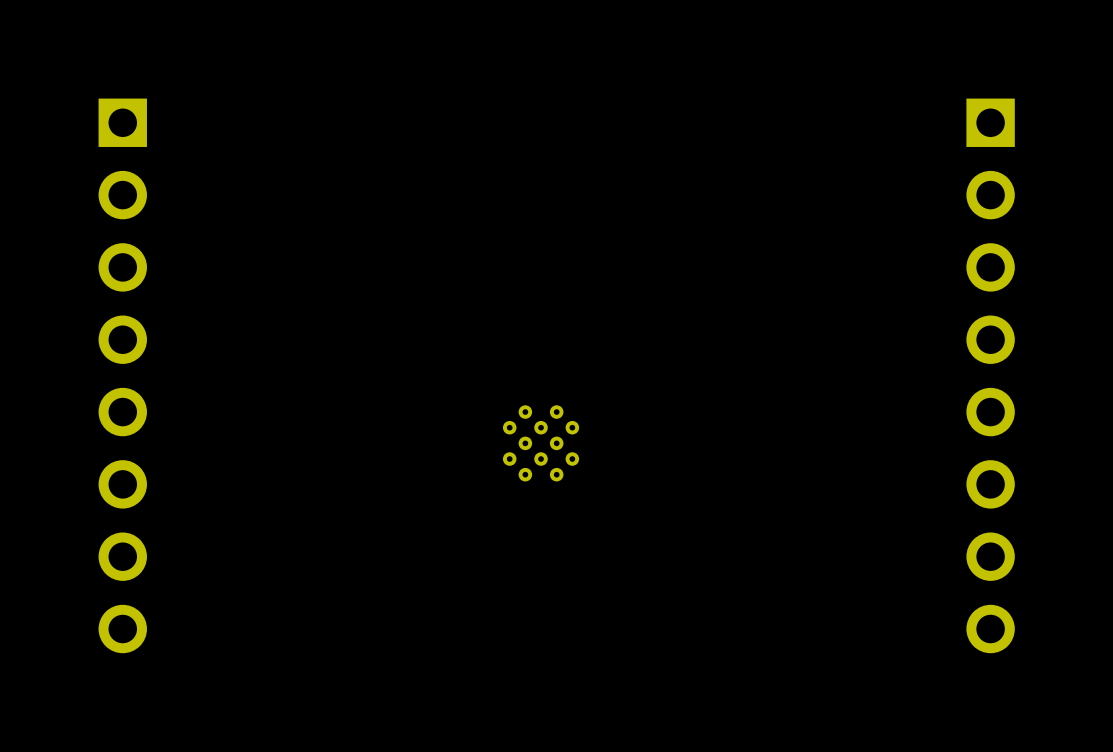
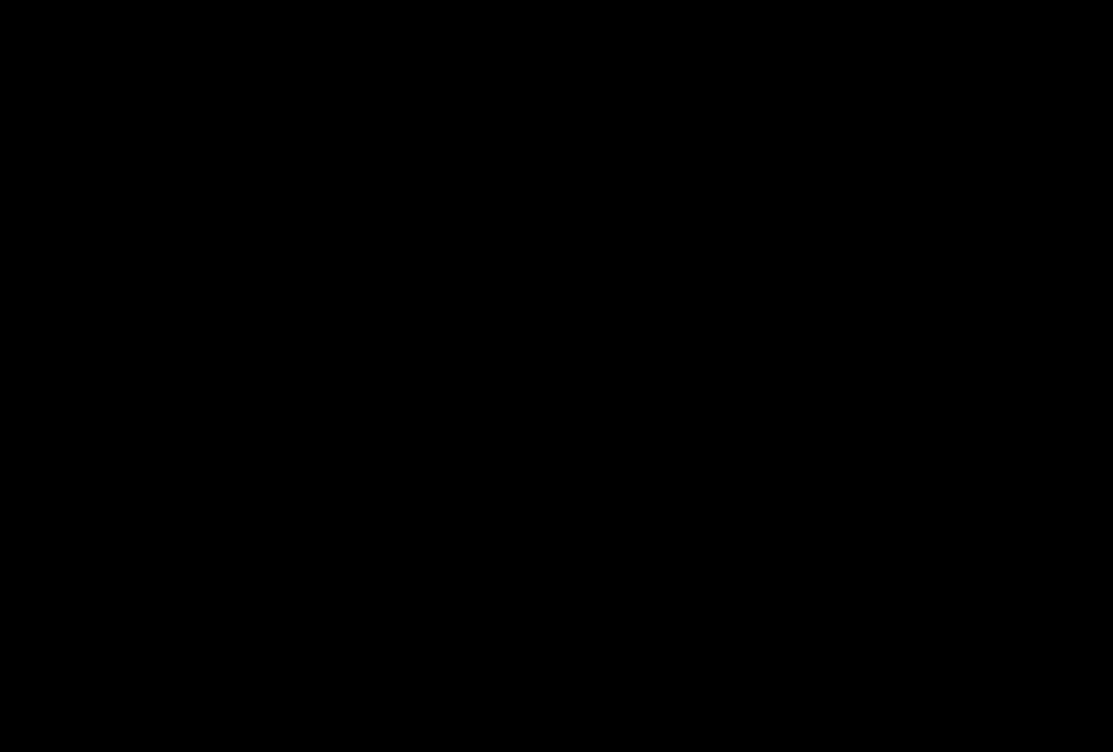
part: (122, 375) -> none
part: (990, 375) -> none
part: (541, 443) -> none

